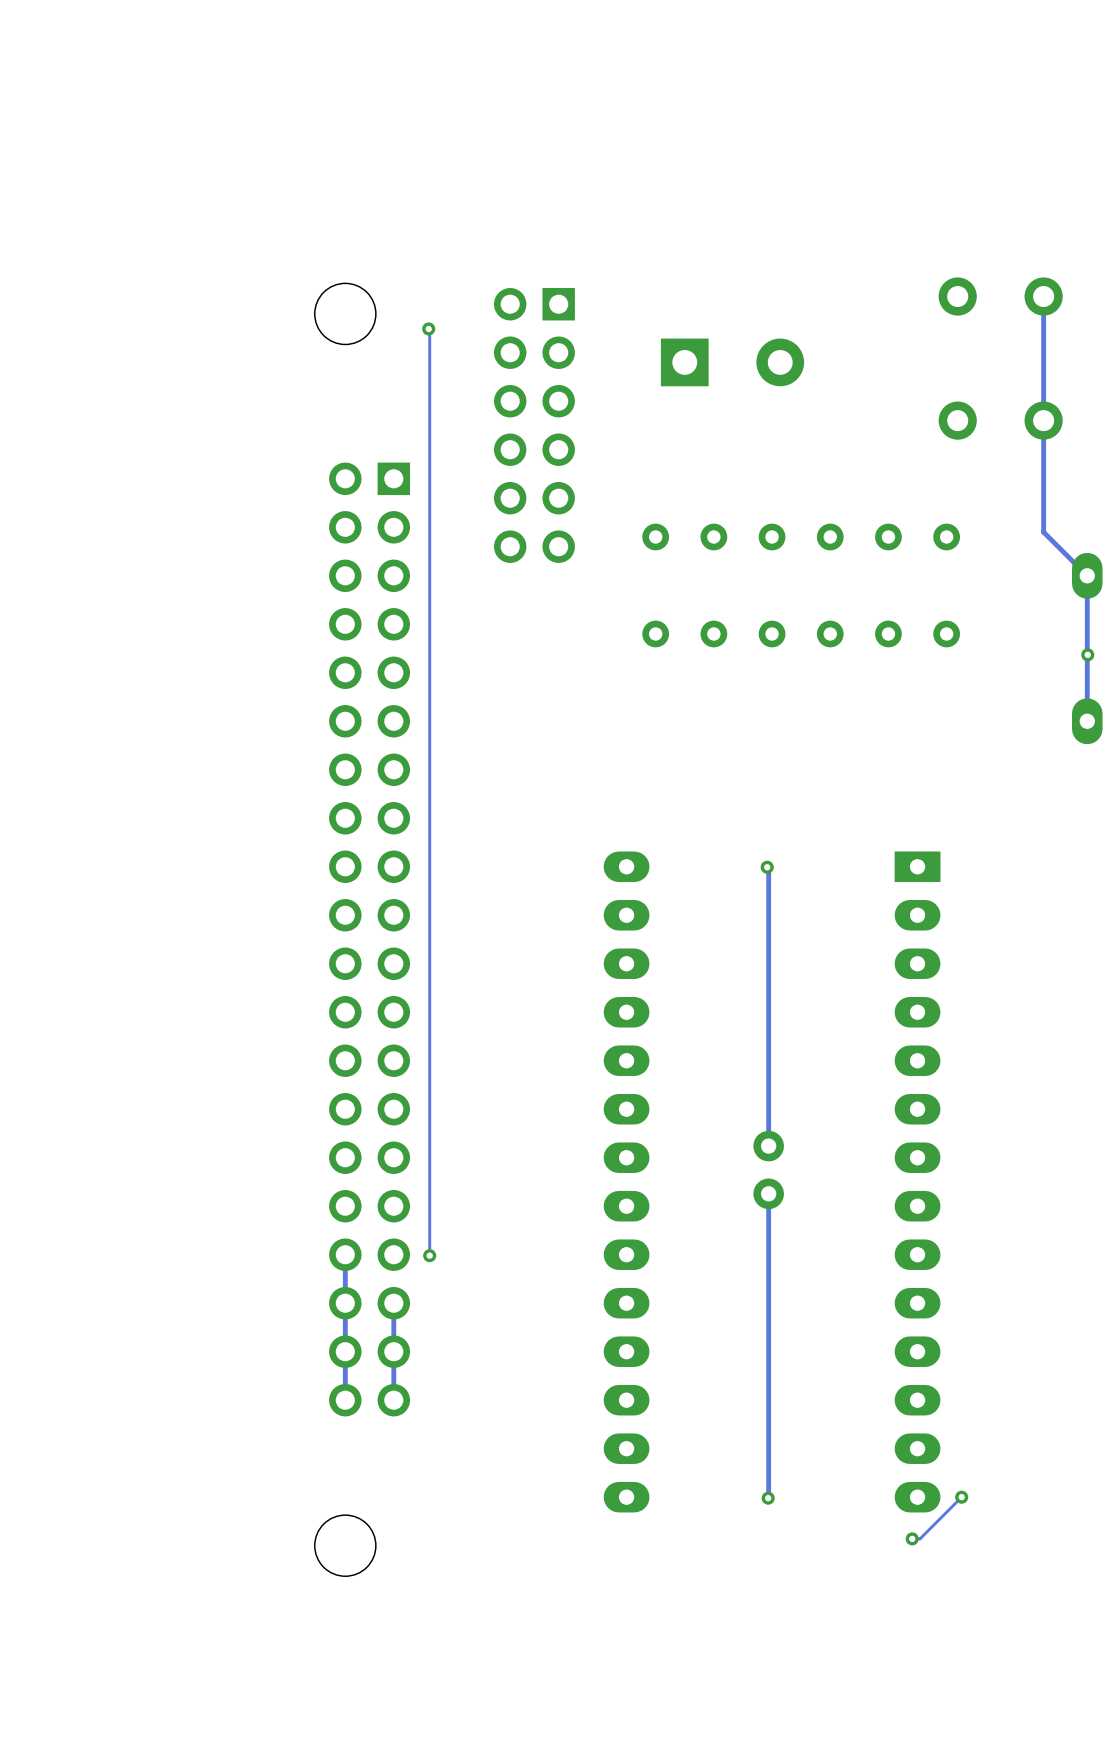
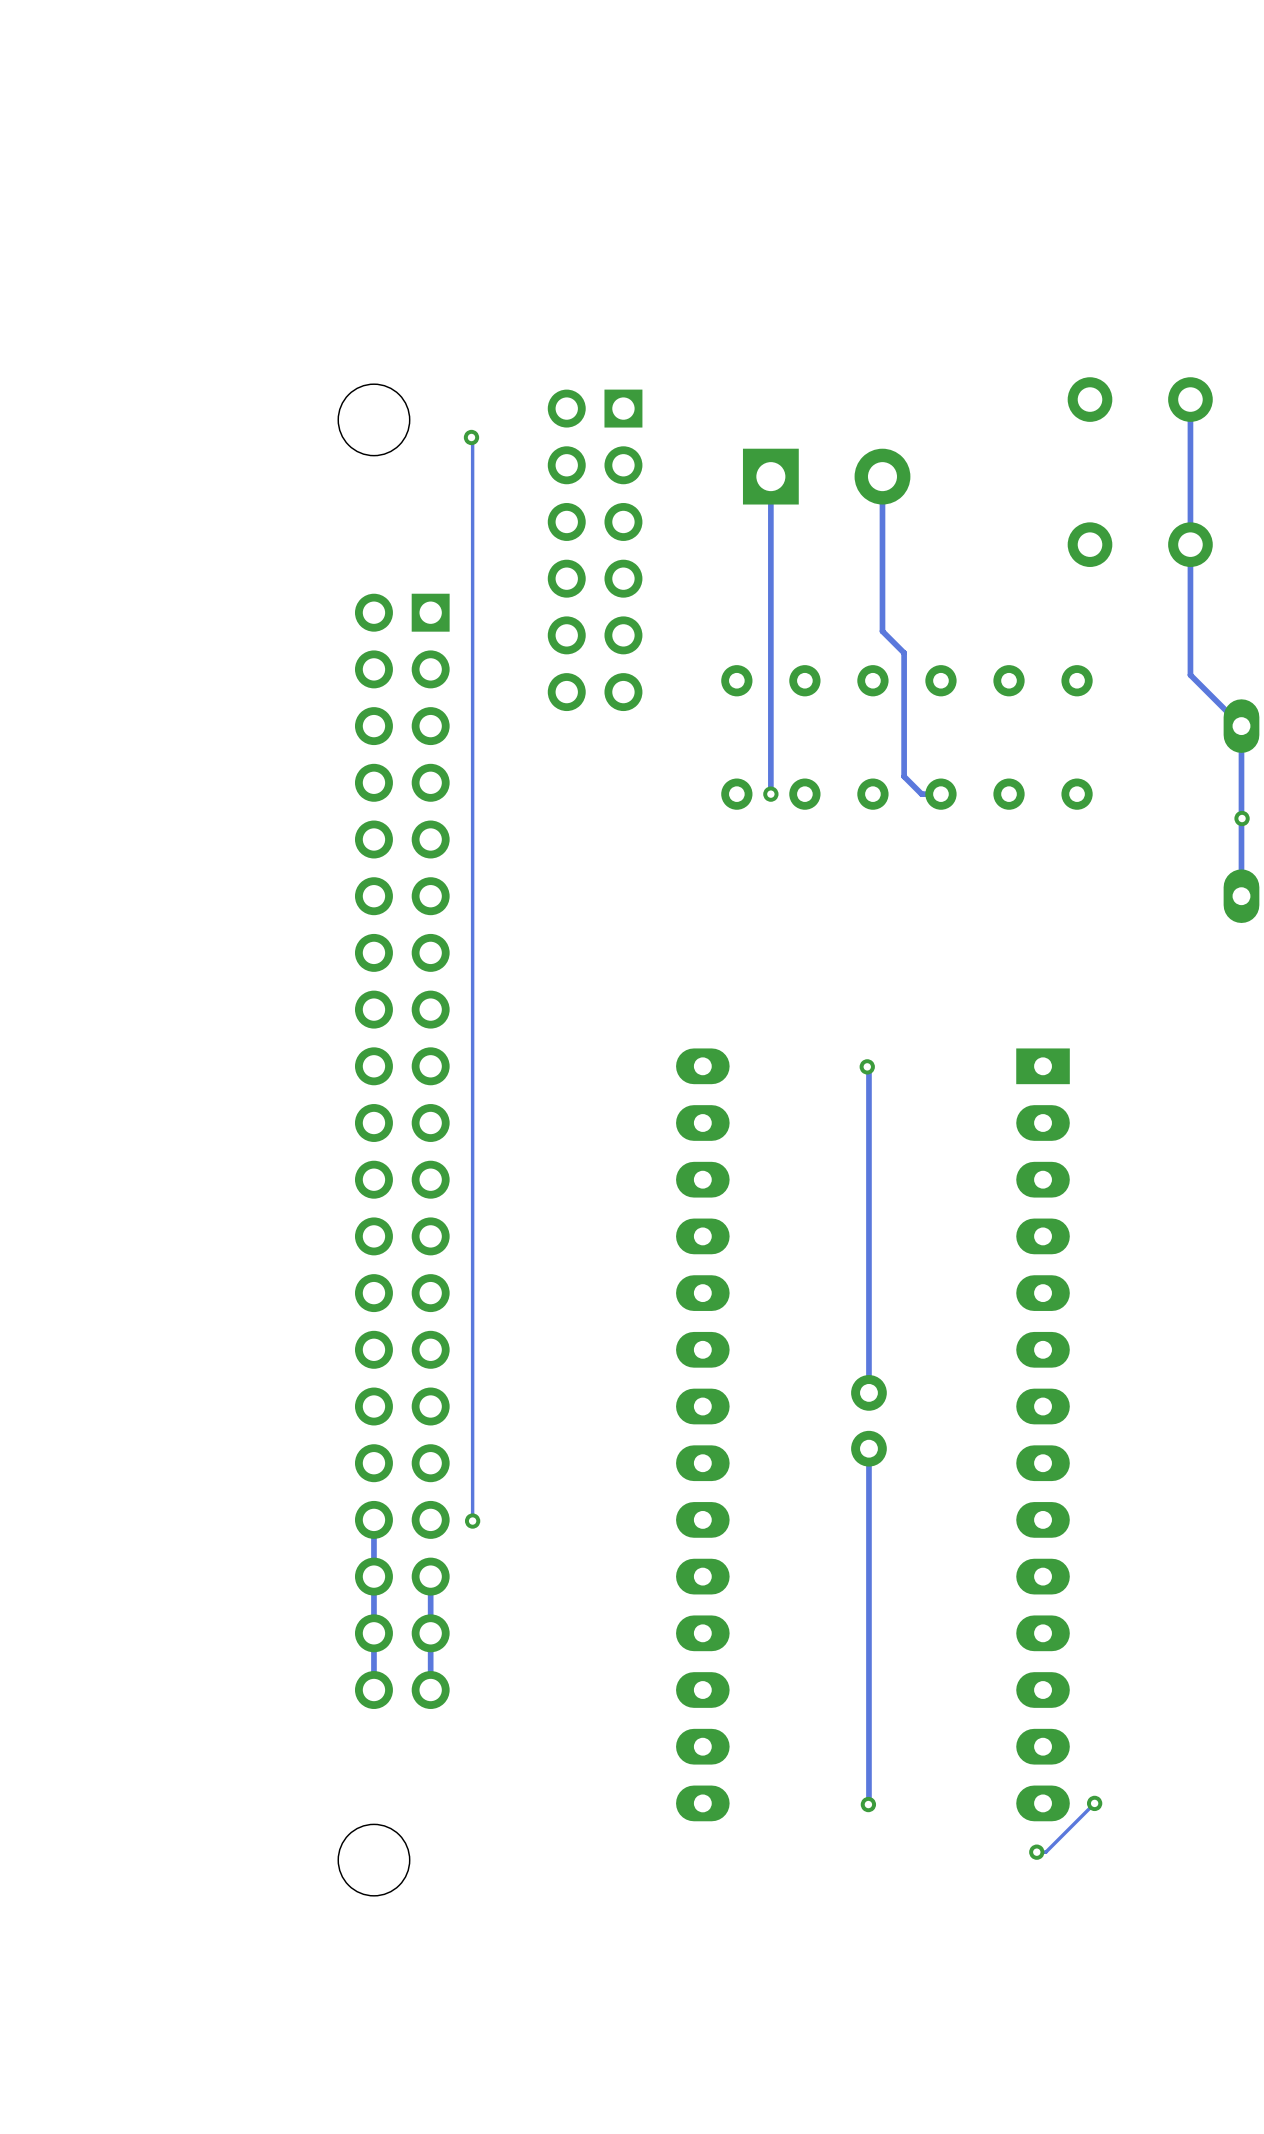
track: none -> (770, 476) (770, 794)
track: none -> (882, 476) (882, 631) (904, 652) (904, 776) (921, 794) (940, 794)
via: none -> (770, 794)

